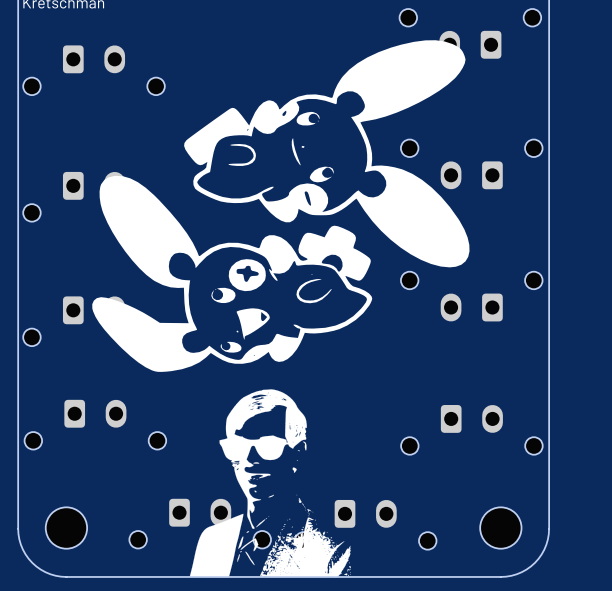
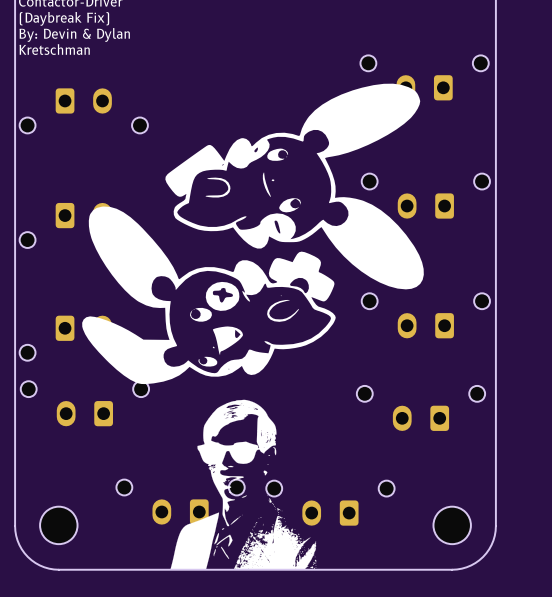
part rotation: 0° (95, 424) -> 180° (84, 403)
part rotation: 0° (471, 429) -> 180° (420, 408)
part rotation: 0° (200, 523) -> 180° (180, 502)
part rotation: 0° (365, 524) -> 180° (330, 503)

